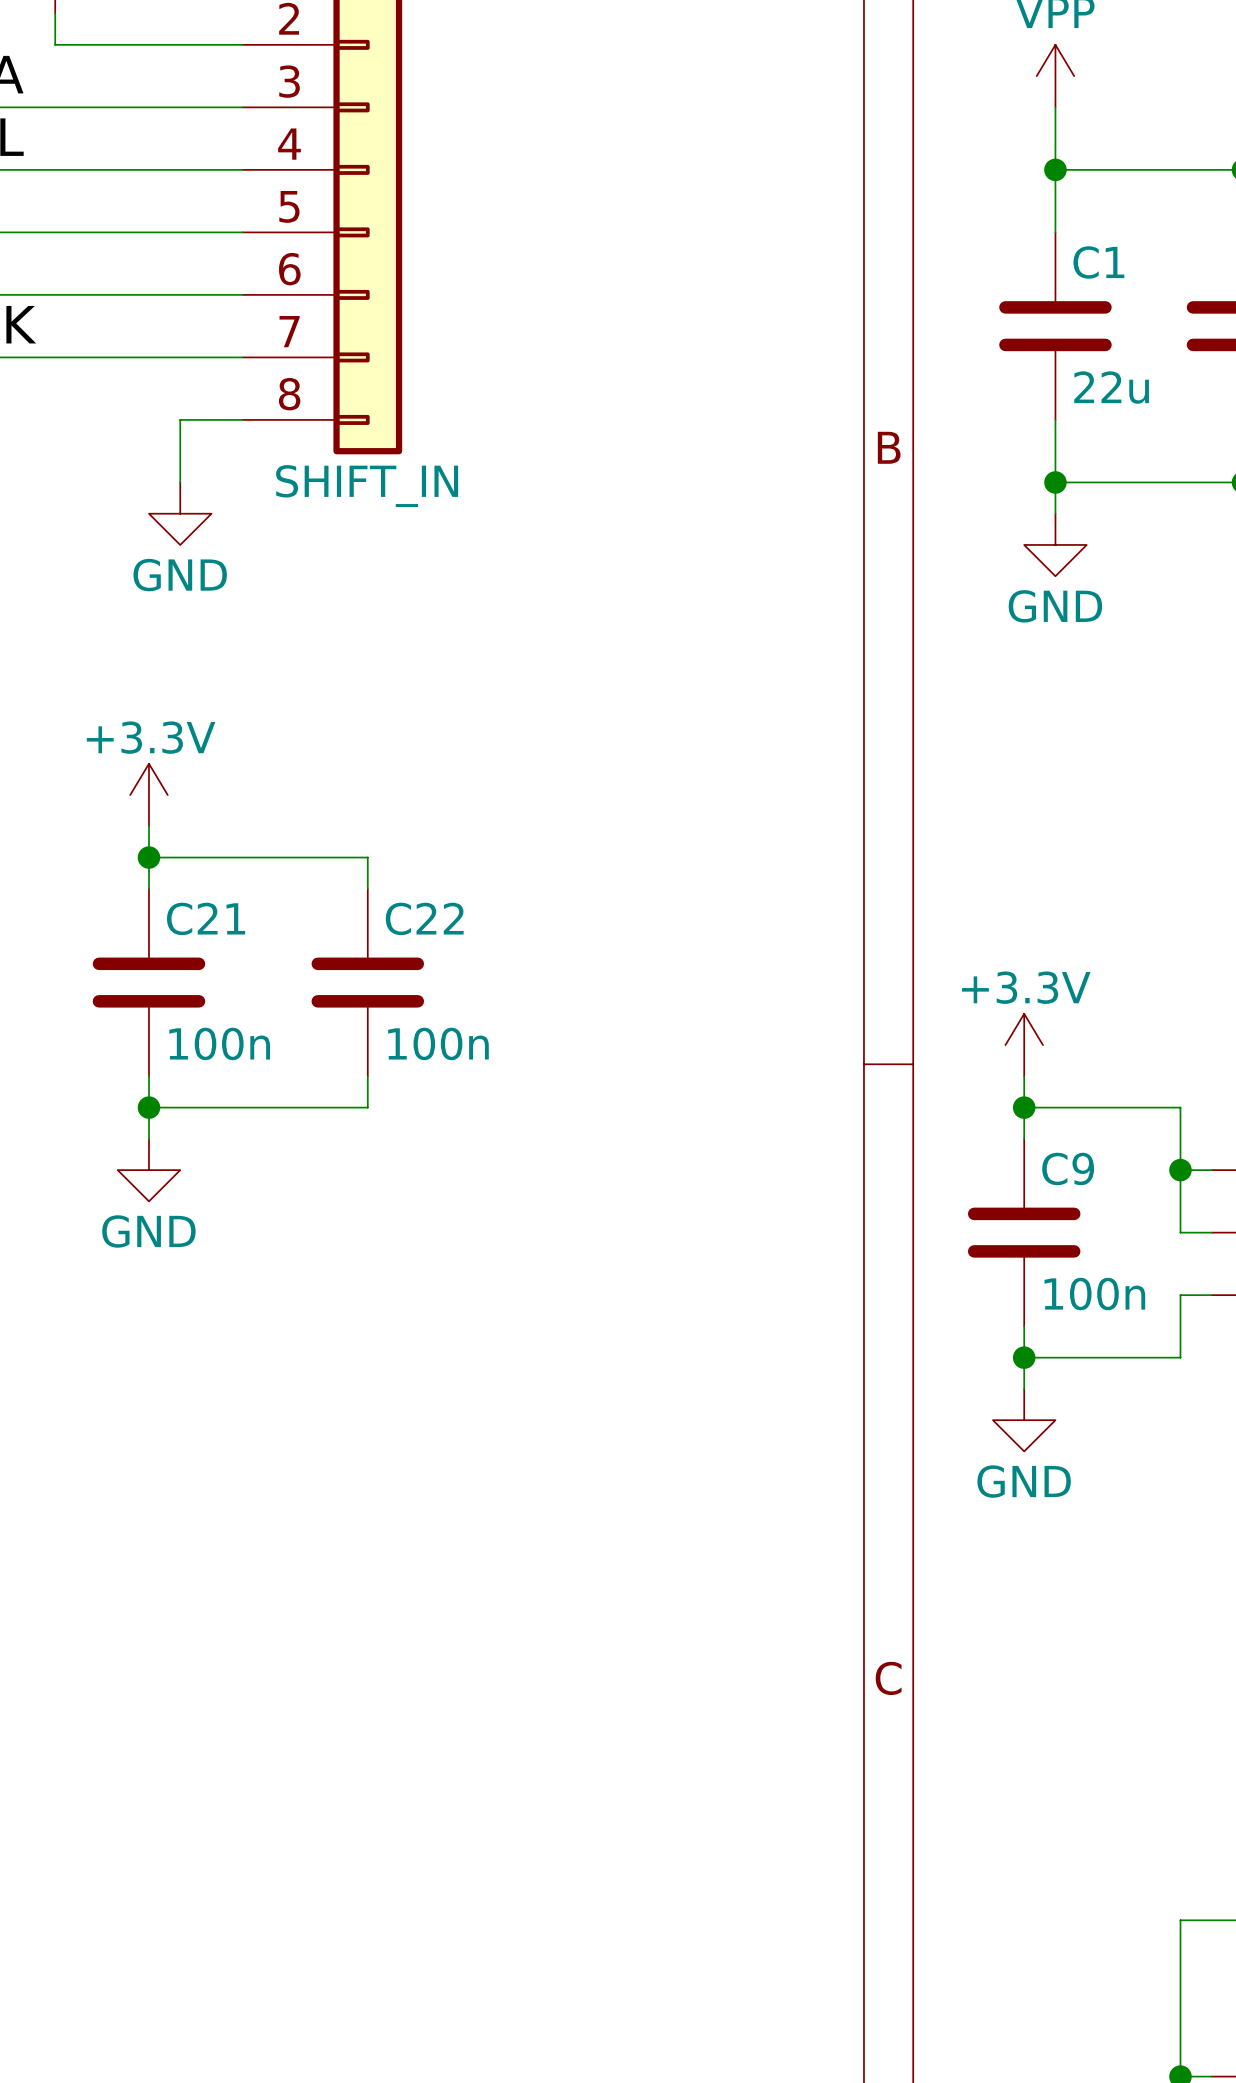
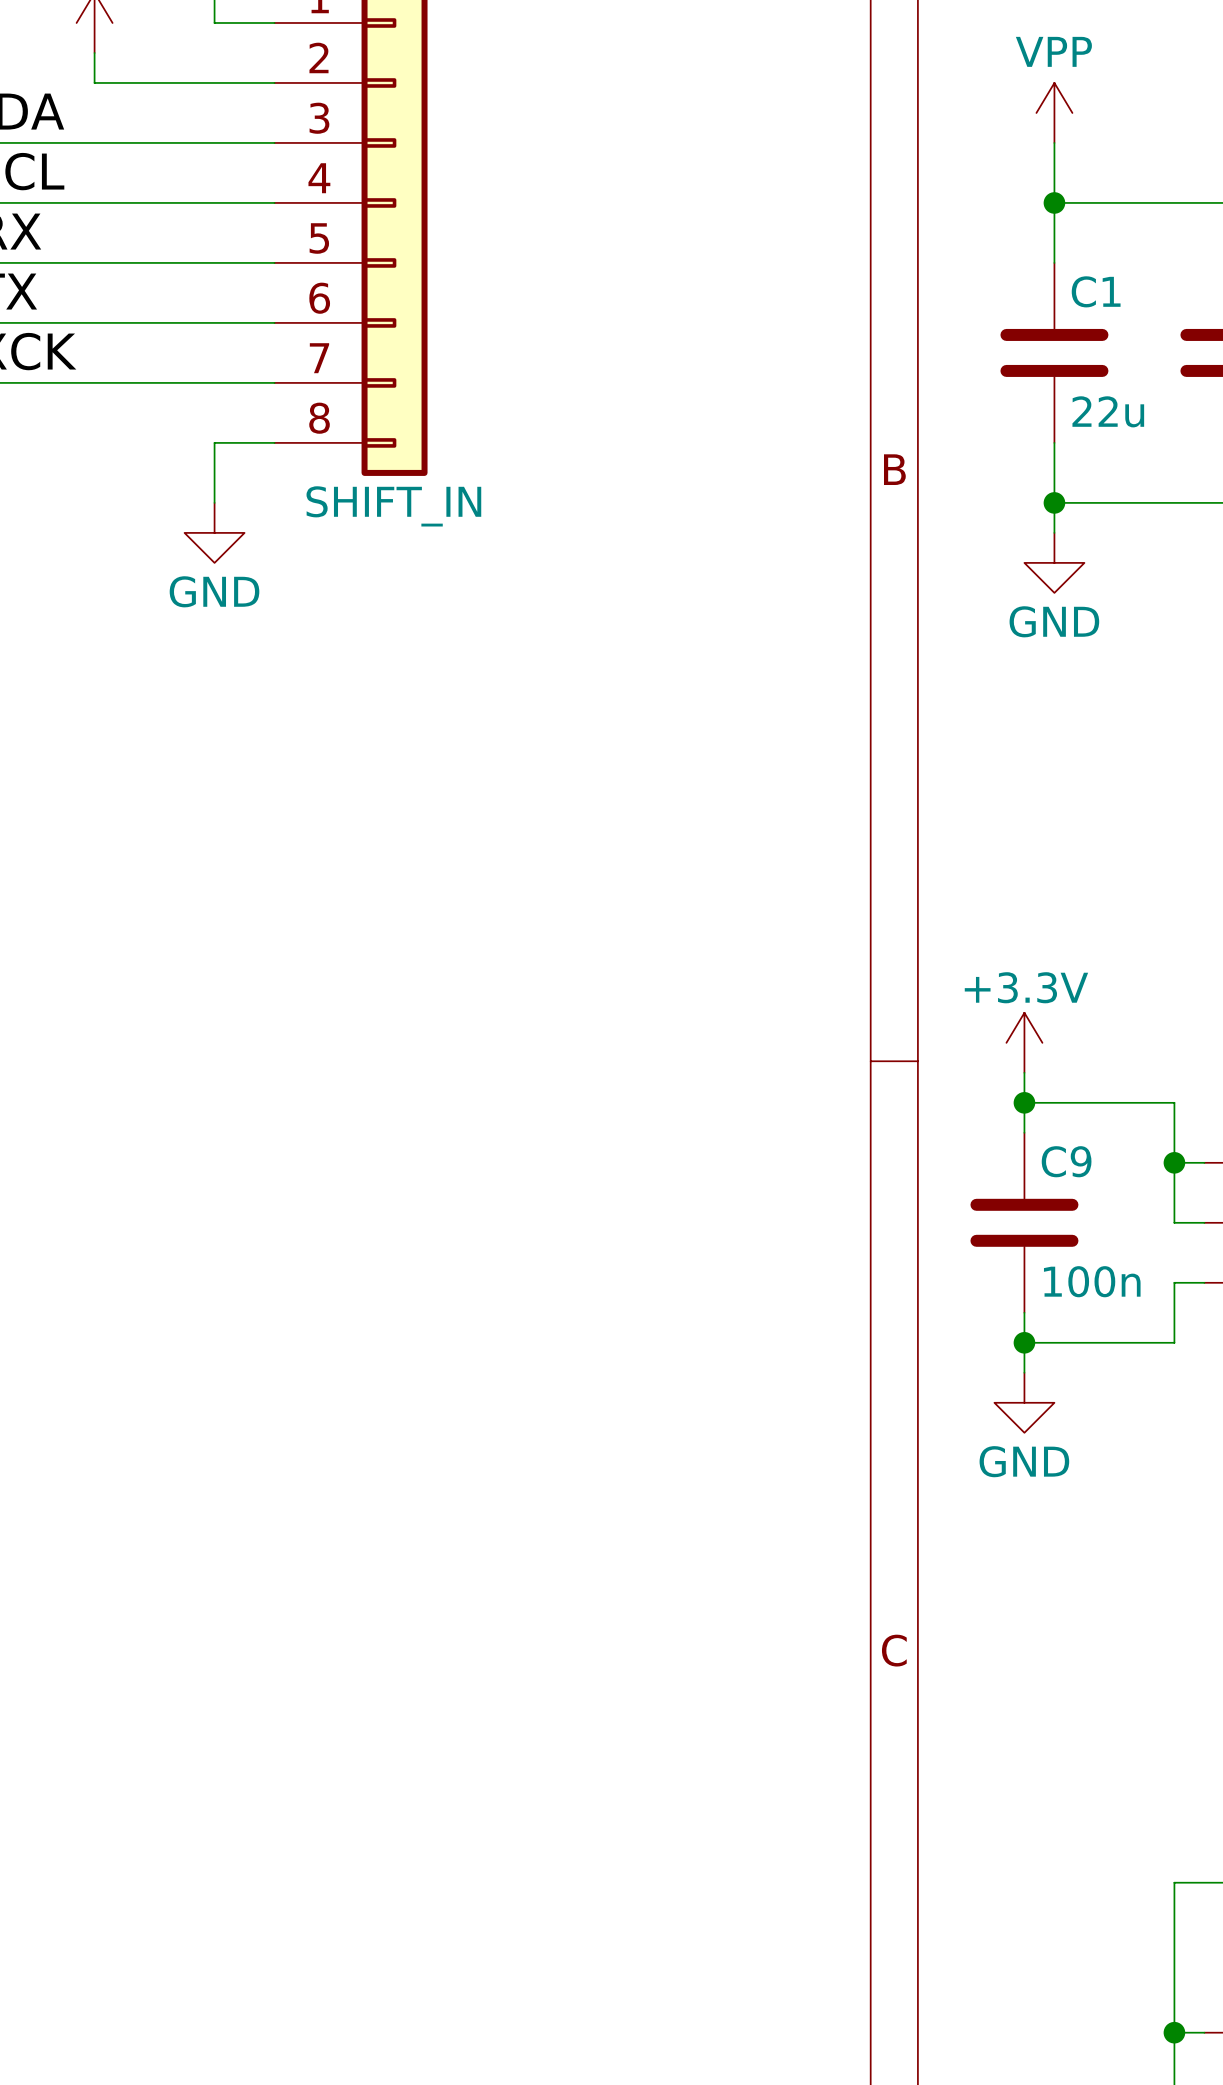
power symbol: +3.3V (148, 795) -> none
wire: (148, 826) (148, 888) -> none
wire: (148, 857) (367, 857) (367, 888) -> none
junction: (148, 857) -> none
C21: 100n (148, 982) -> none
C22: 100n (367, 982) -> none
wire: (148, 1076) (148, 1138) -> none
wire: (367, 1076) (367, 1107) (148, 1107) -> none
junction: (148, 1107) -> none
power symbol: GND (148, 1170) -> none

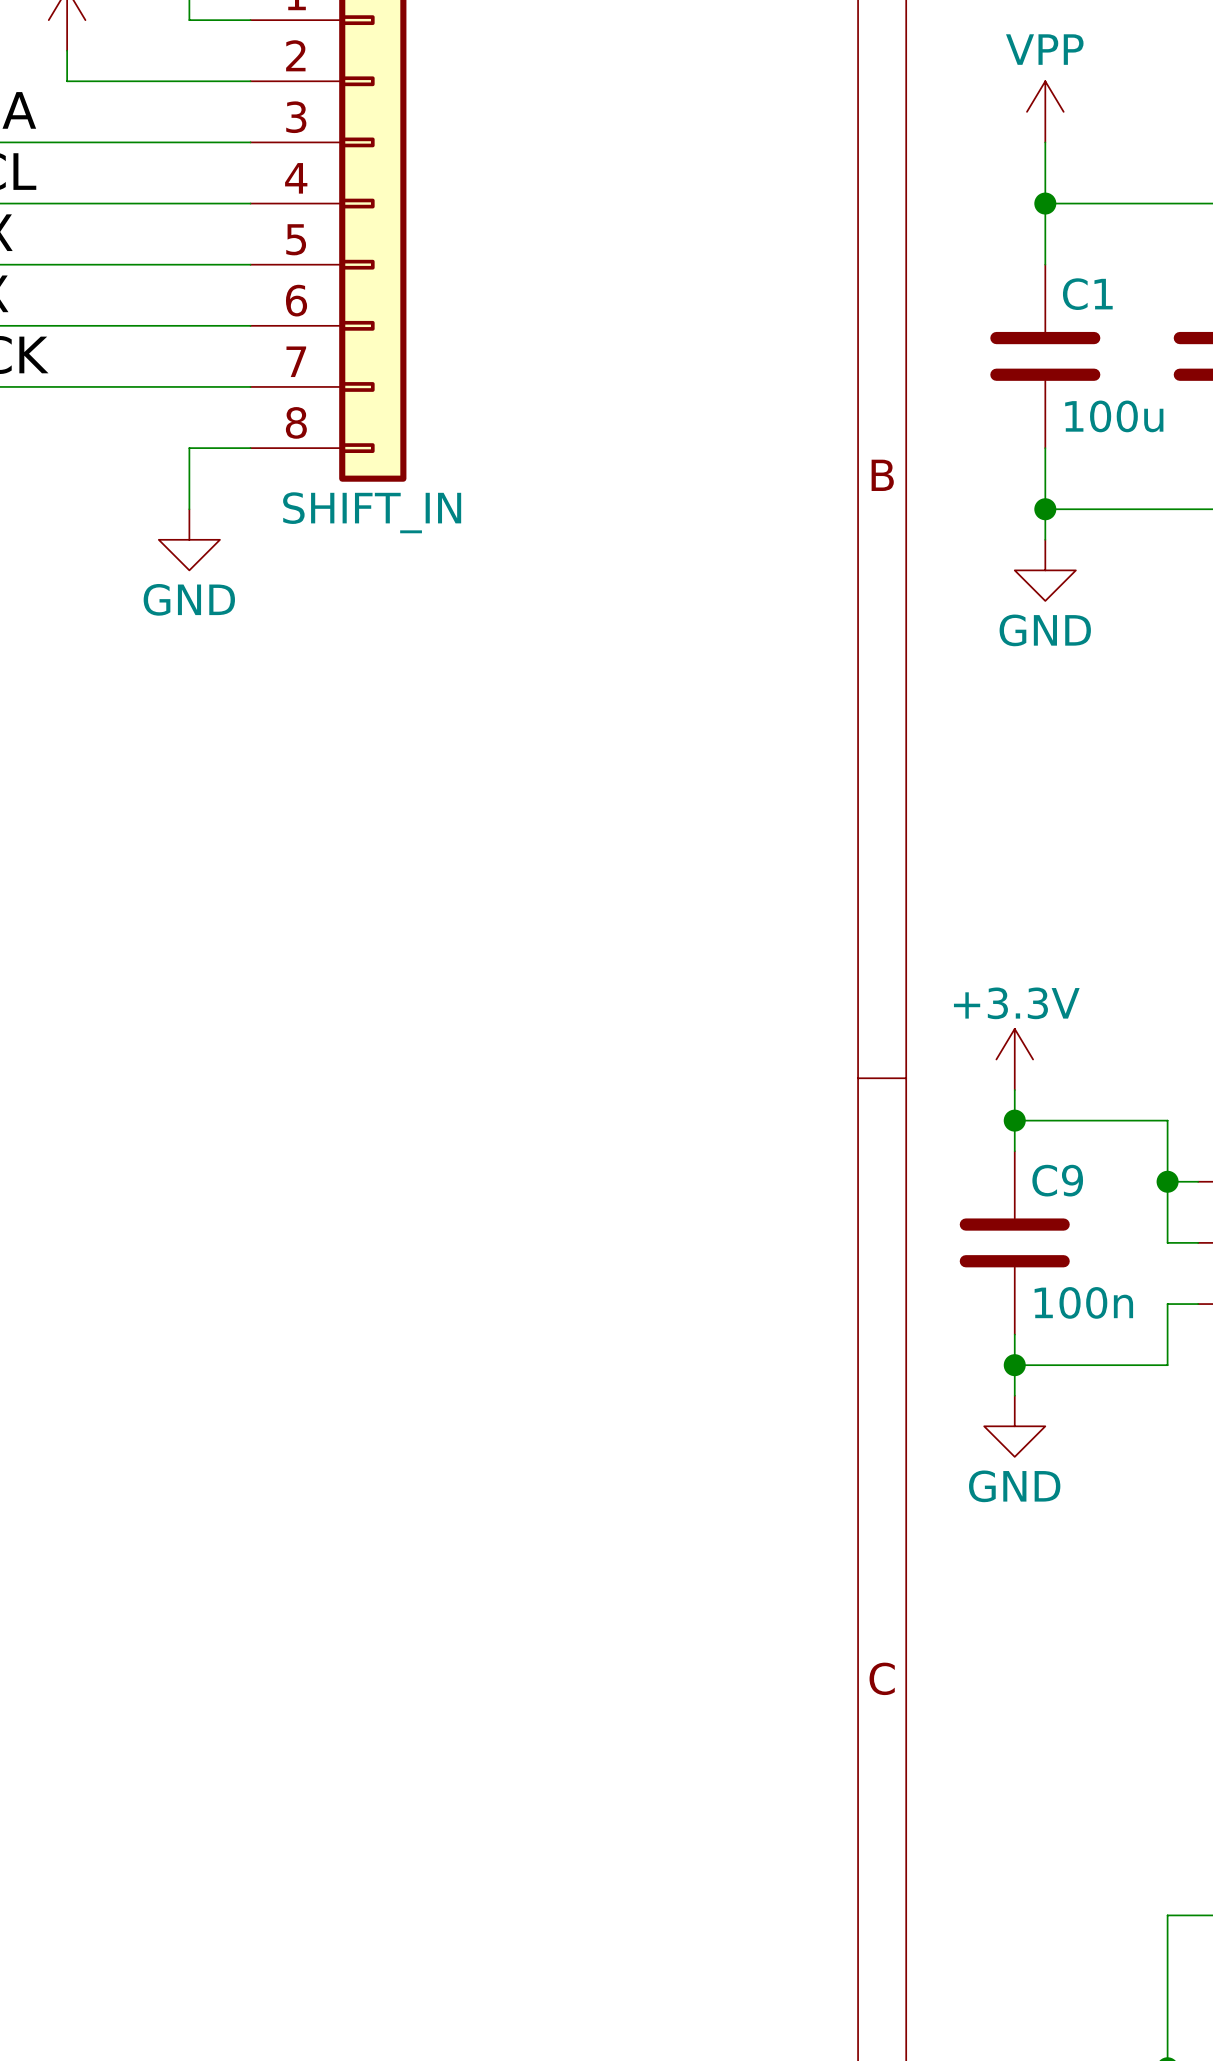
C1 value: 22u (1108, 411) -> 100u (1114, 416)

